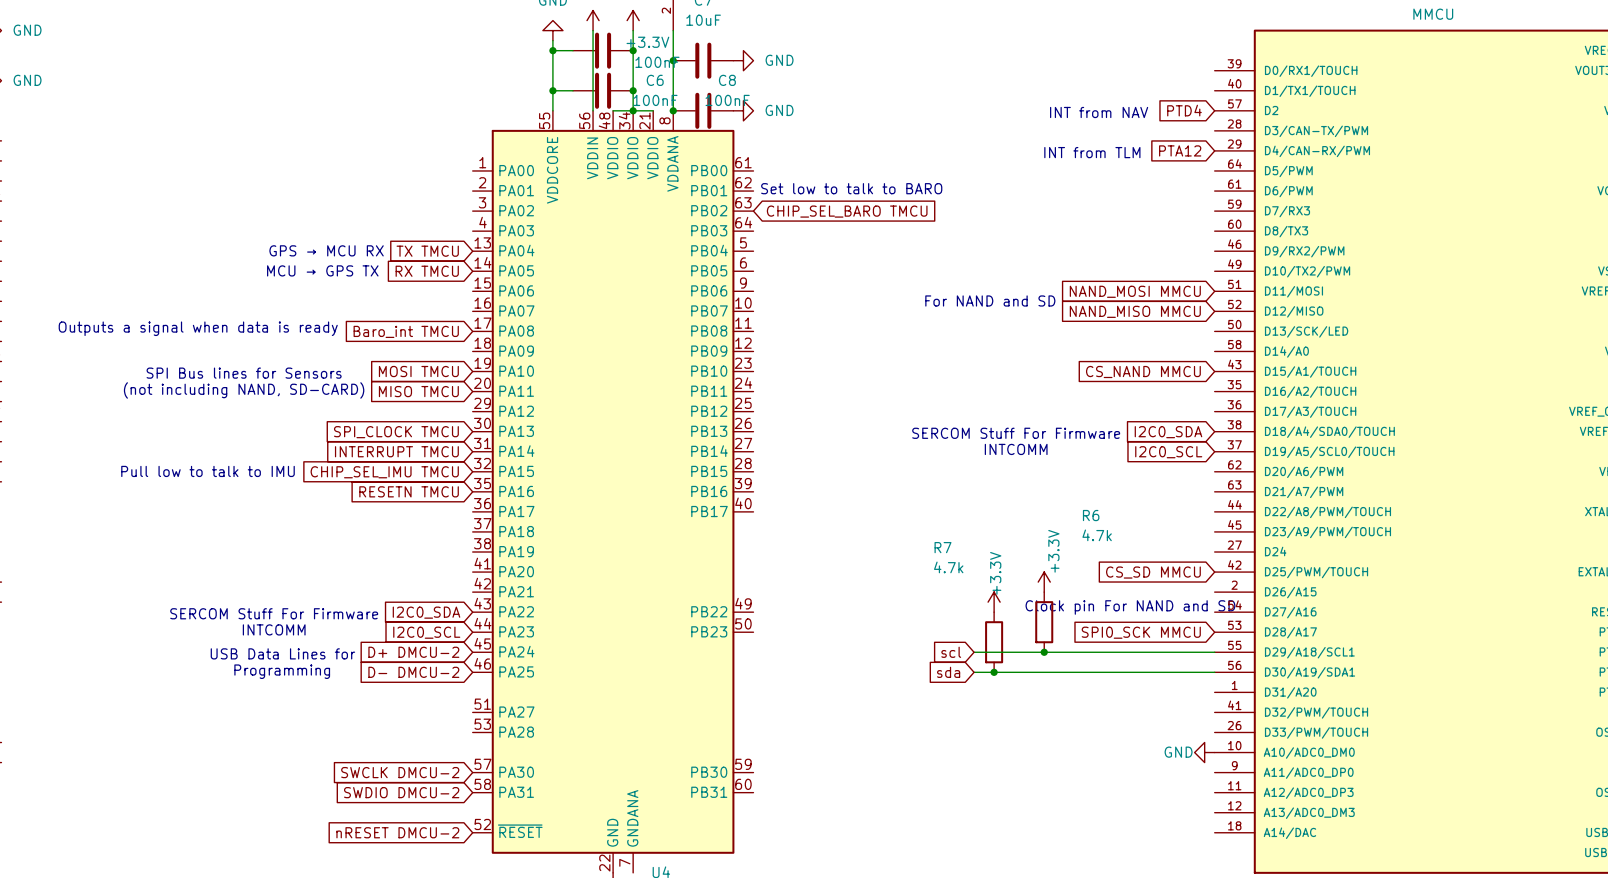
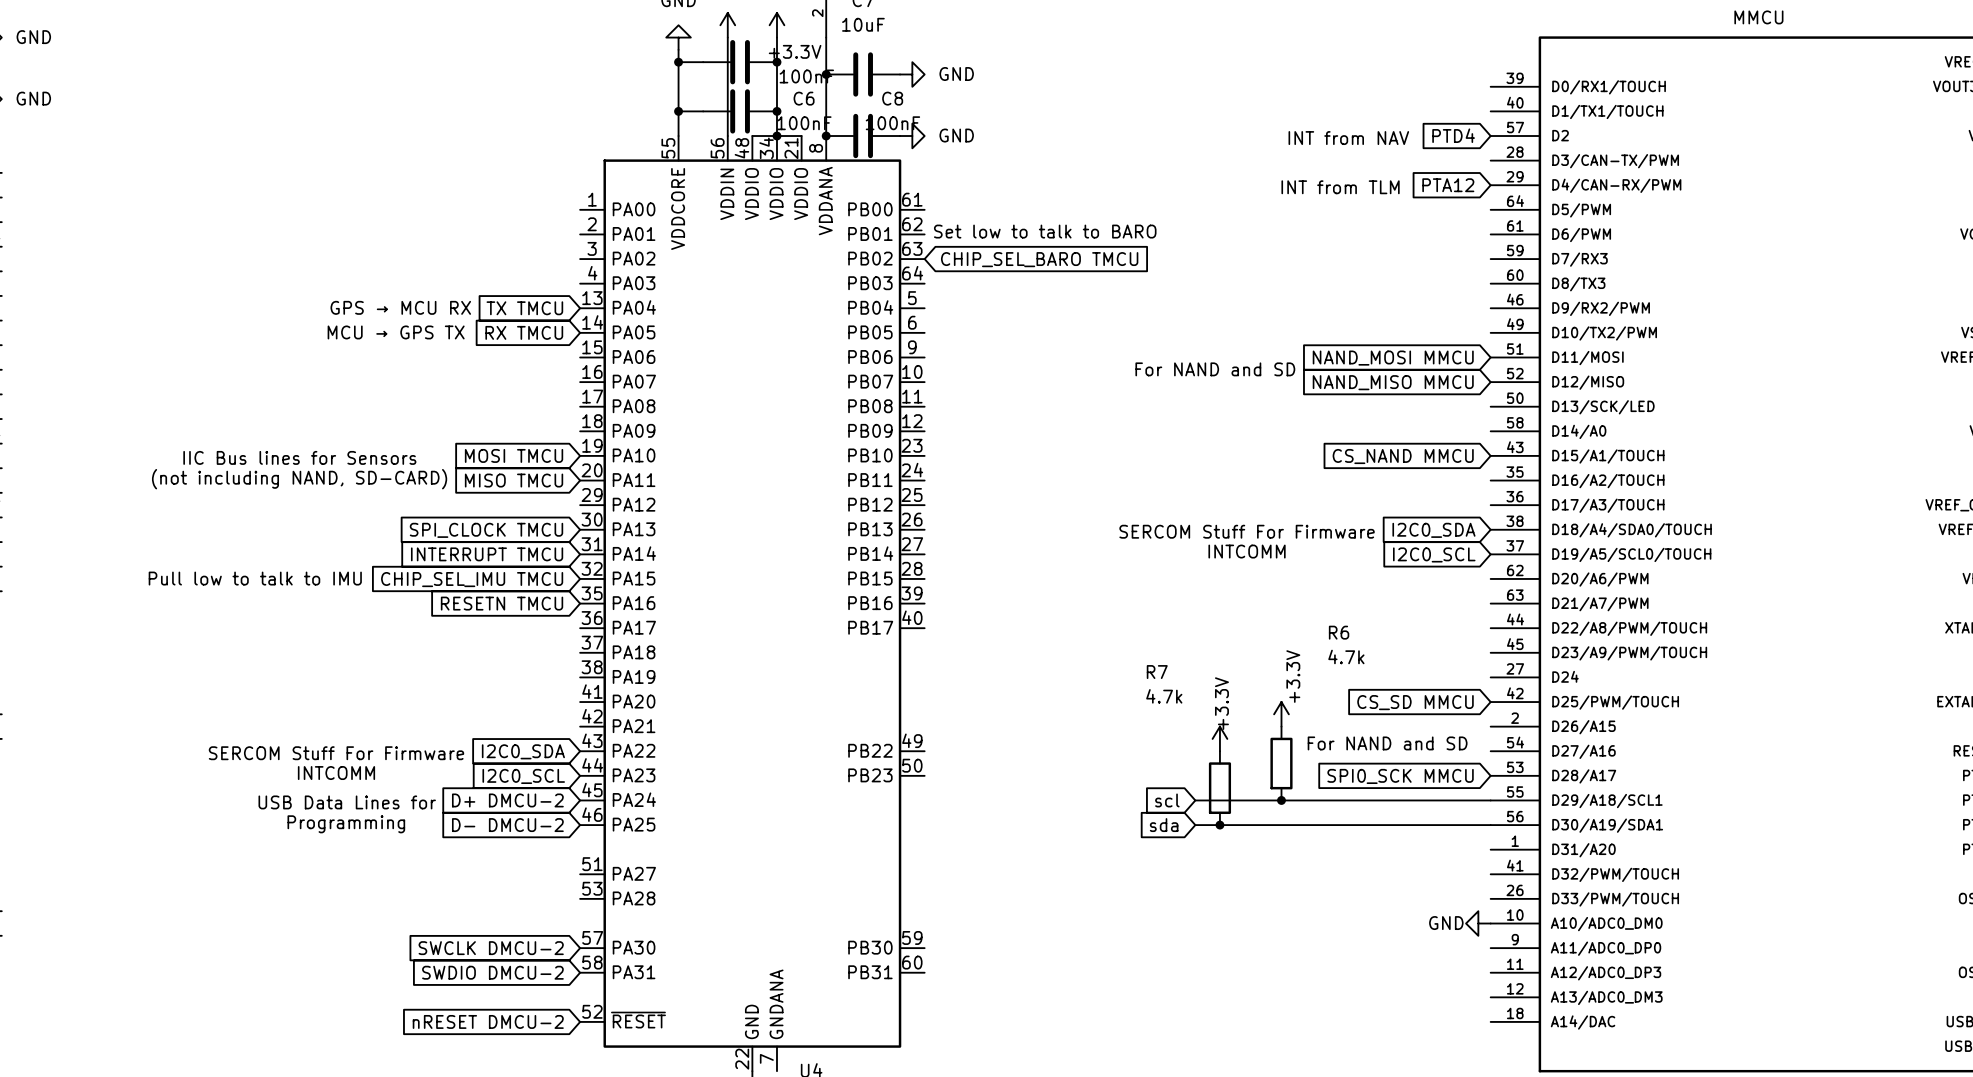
text: Outputs a signal when data is ready (198, 328) -> none
global label: Baro_int TMCU (406, 331) -> none
text: SPI Bus lines for Sensors (244, 373) -> IIC Bus lines for Sensors (299, 457)
text: Clock pin For NAND and SD (1130, 607) -> For NAND and SD (1387, 743)

